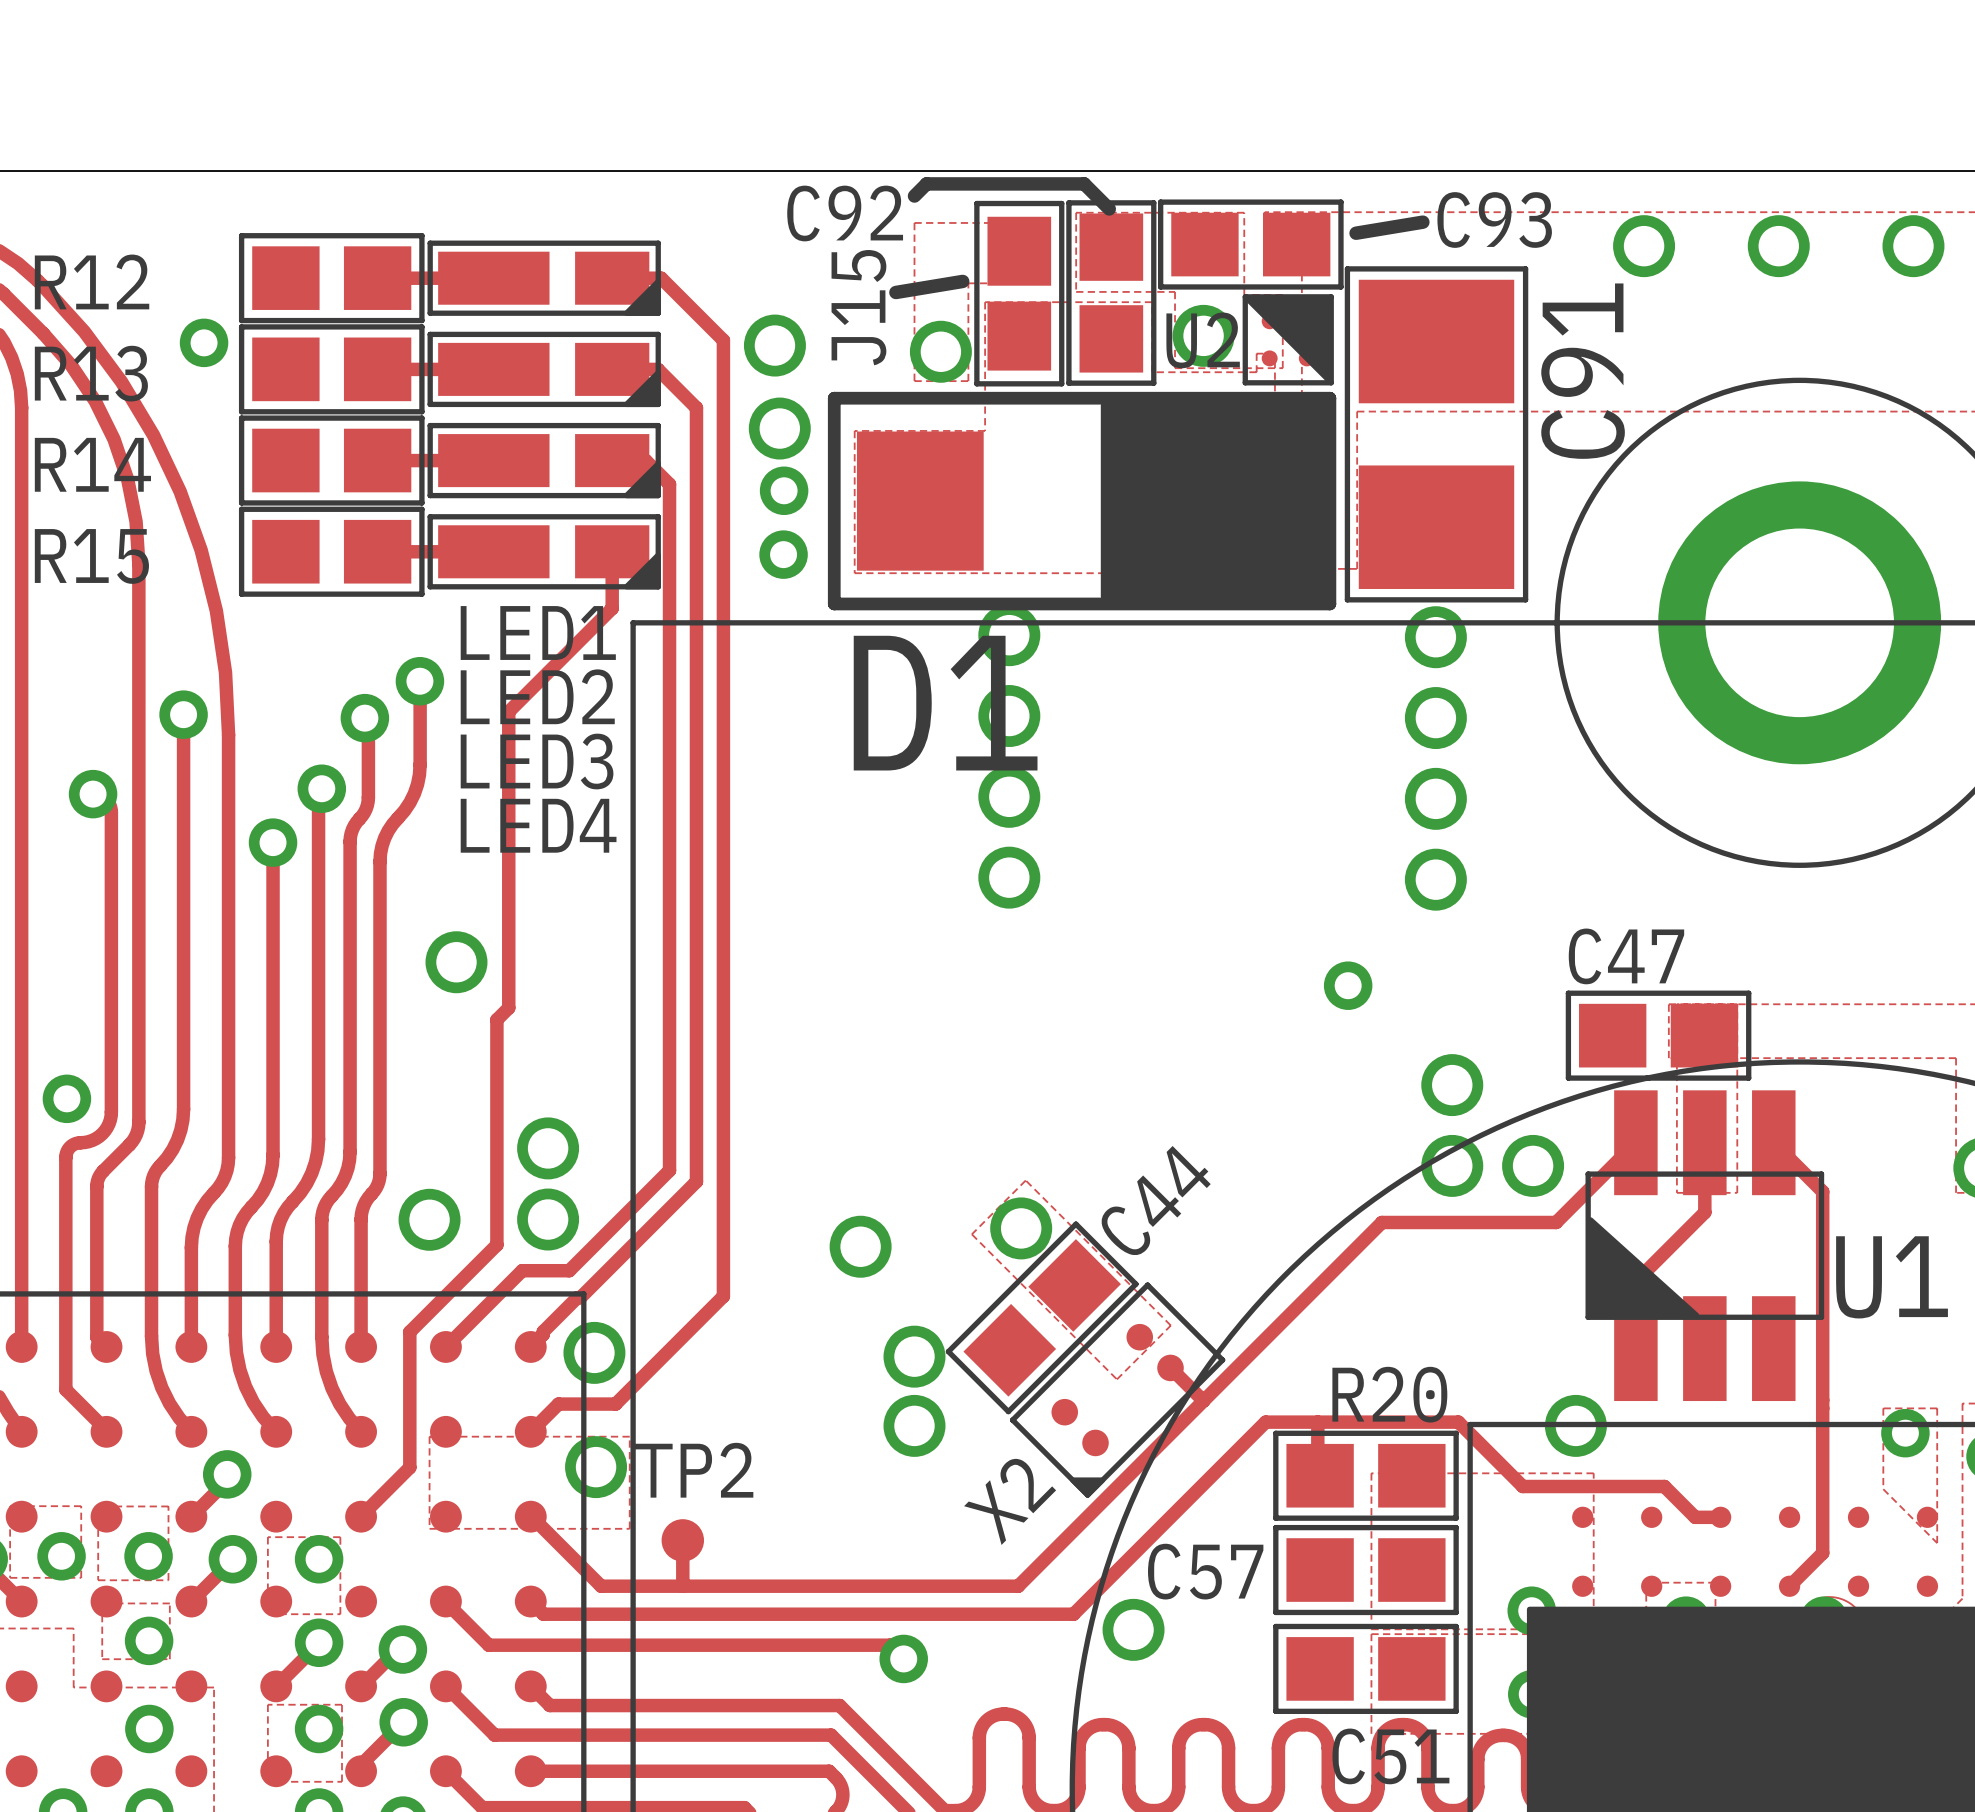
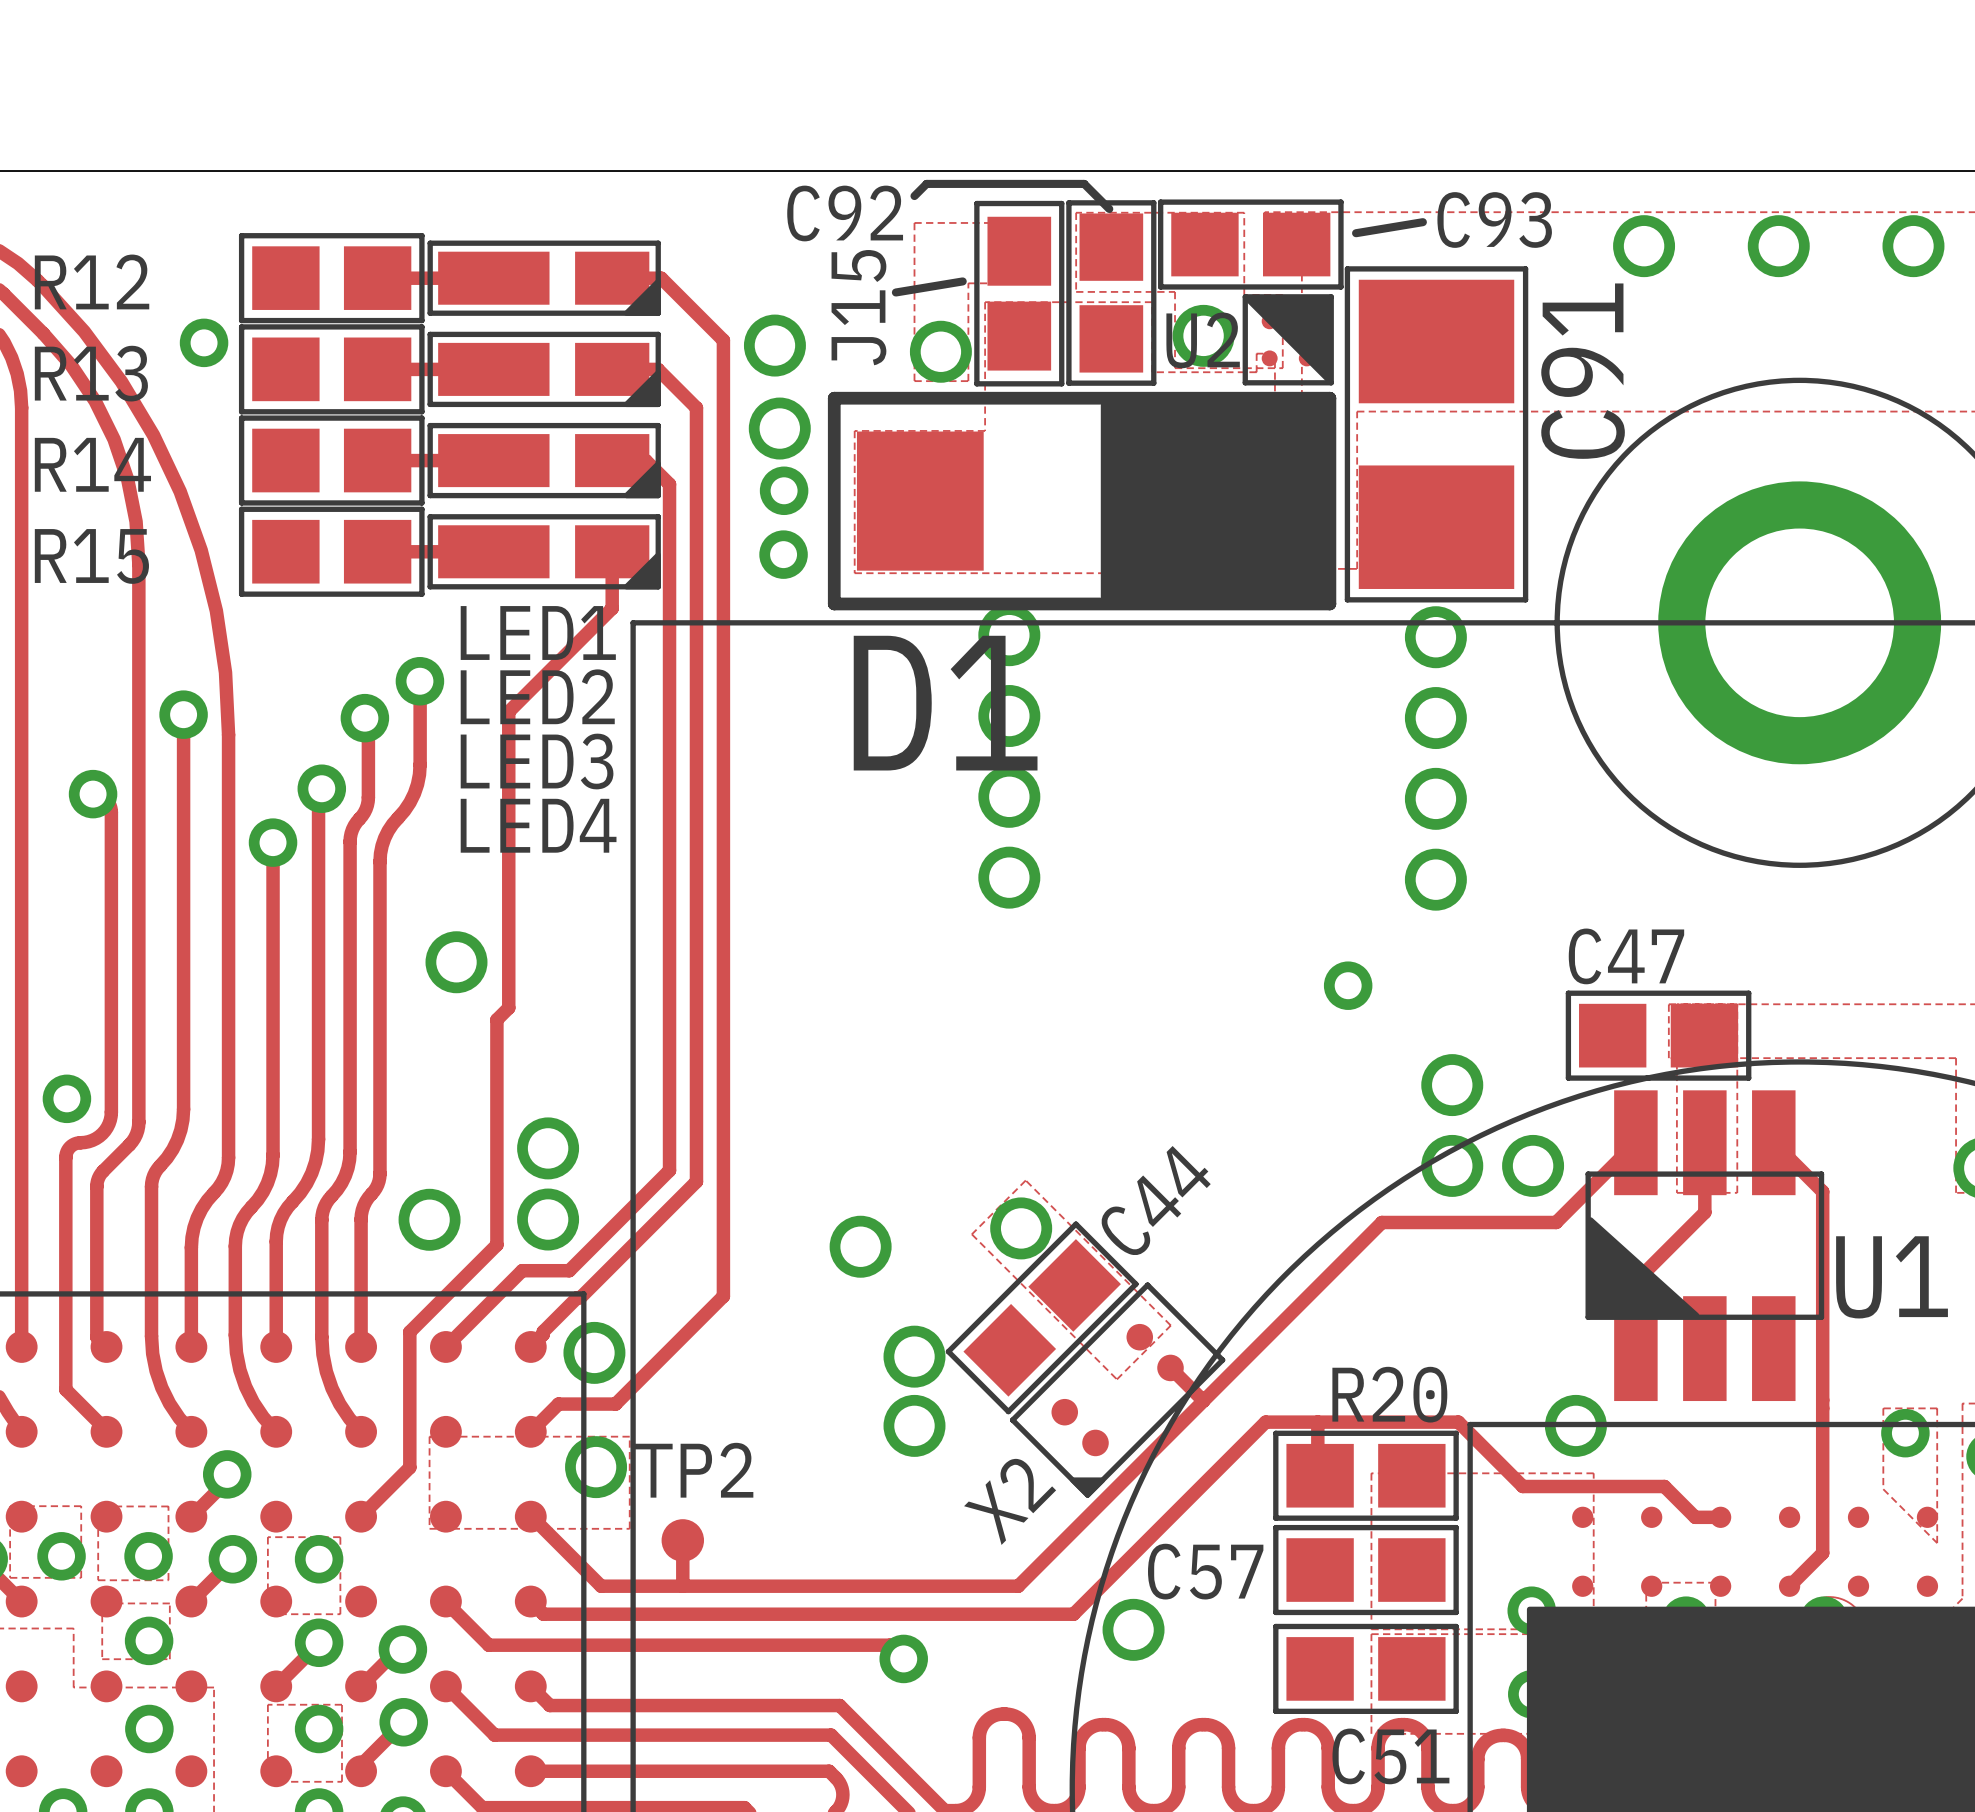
line width: thick (914, 196) (926, 183) (1084, 183) (1109, 208) -> thin (914, 196) (926, 183) (1084, 183) (1109, 208)
line width: thick (1422, 222) (1356, 233) -> thin (1422, 222) (1356, 233)
line width: thick (962, 281) (895, 292) -> thin (962, 281) (895, 292)

